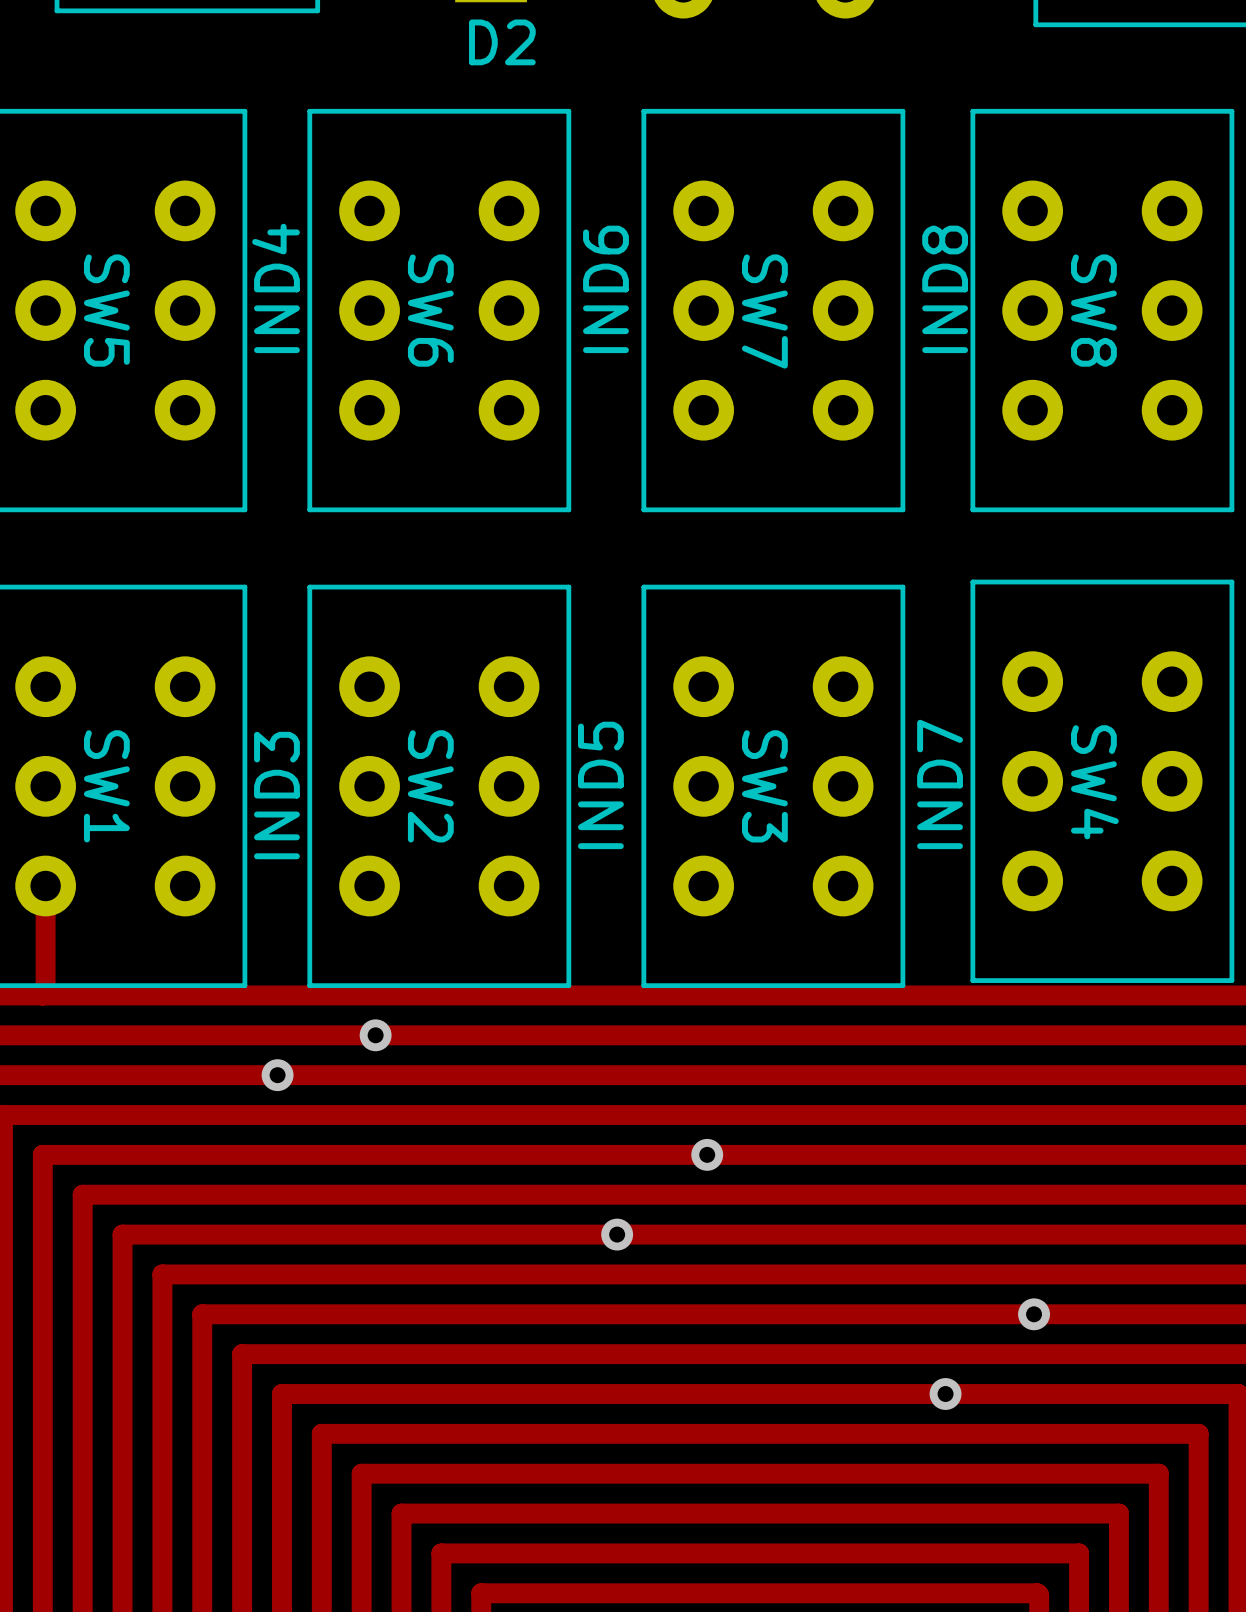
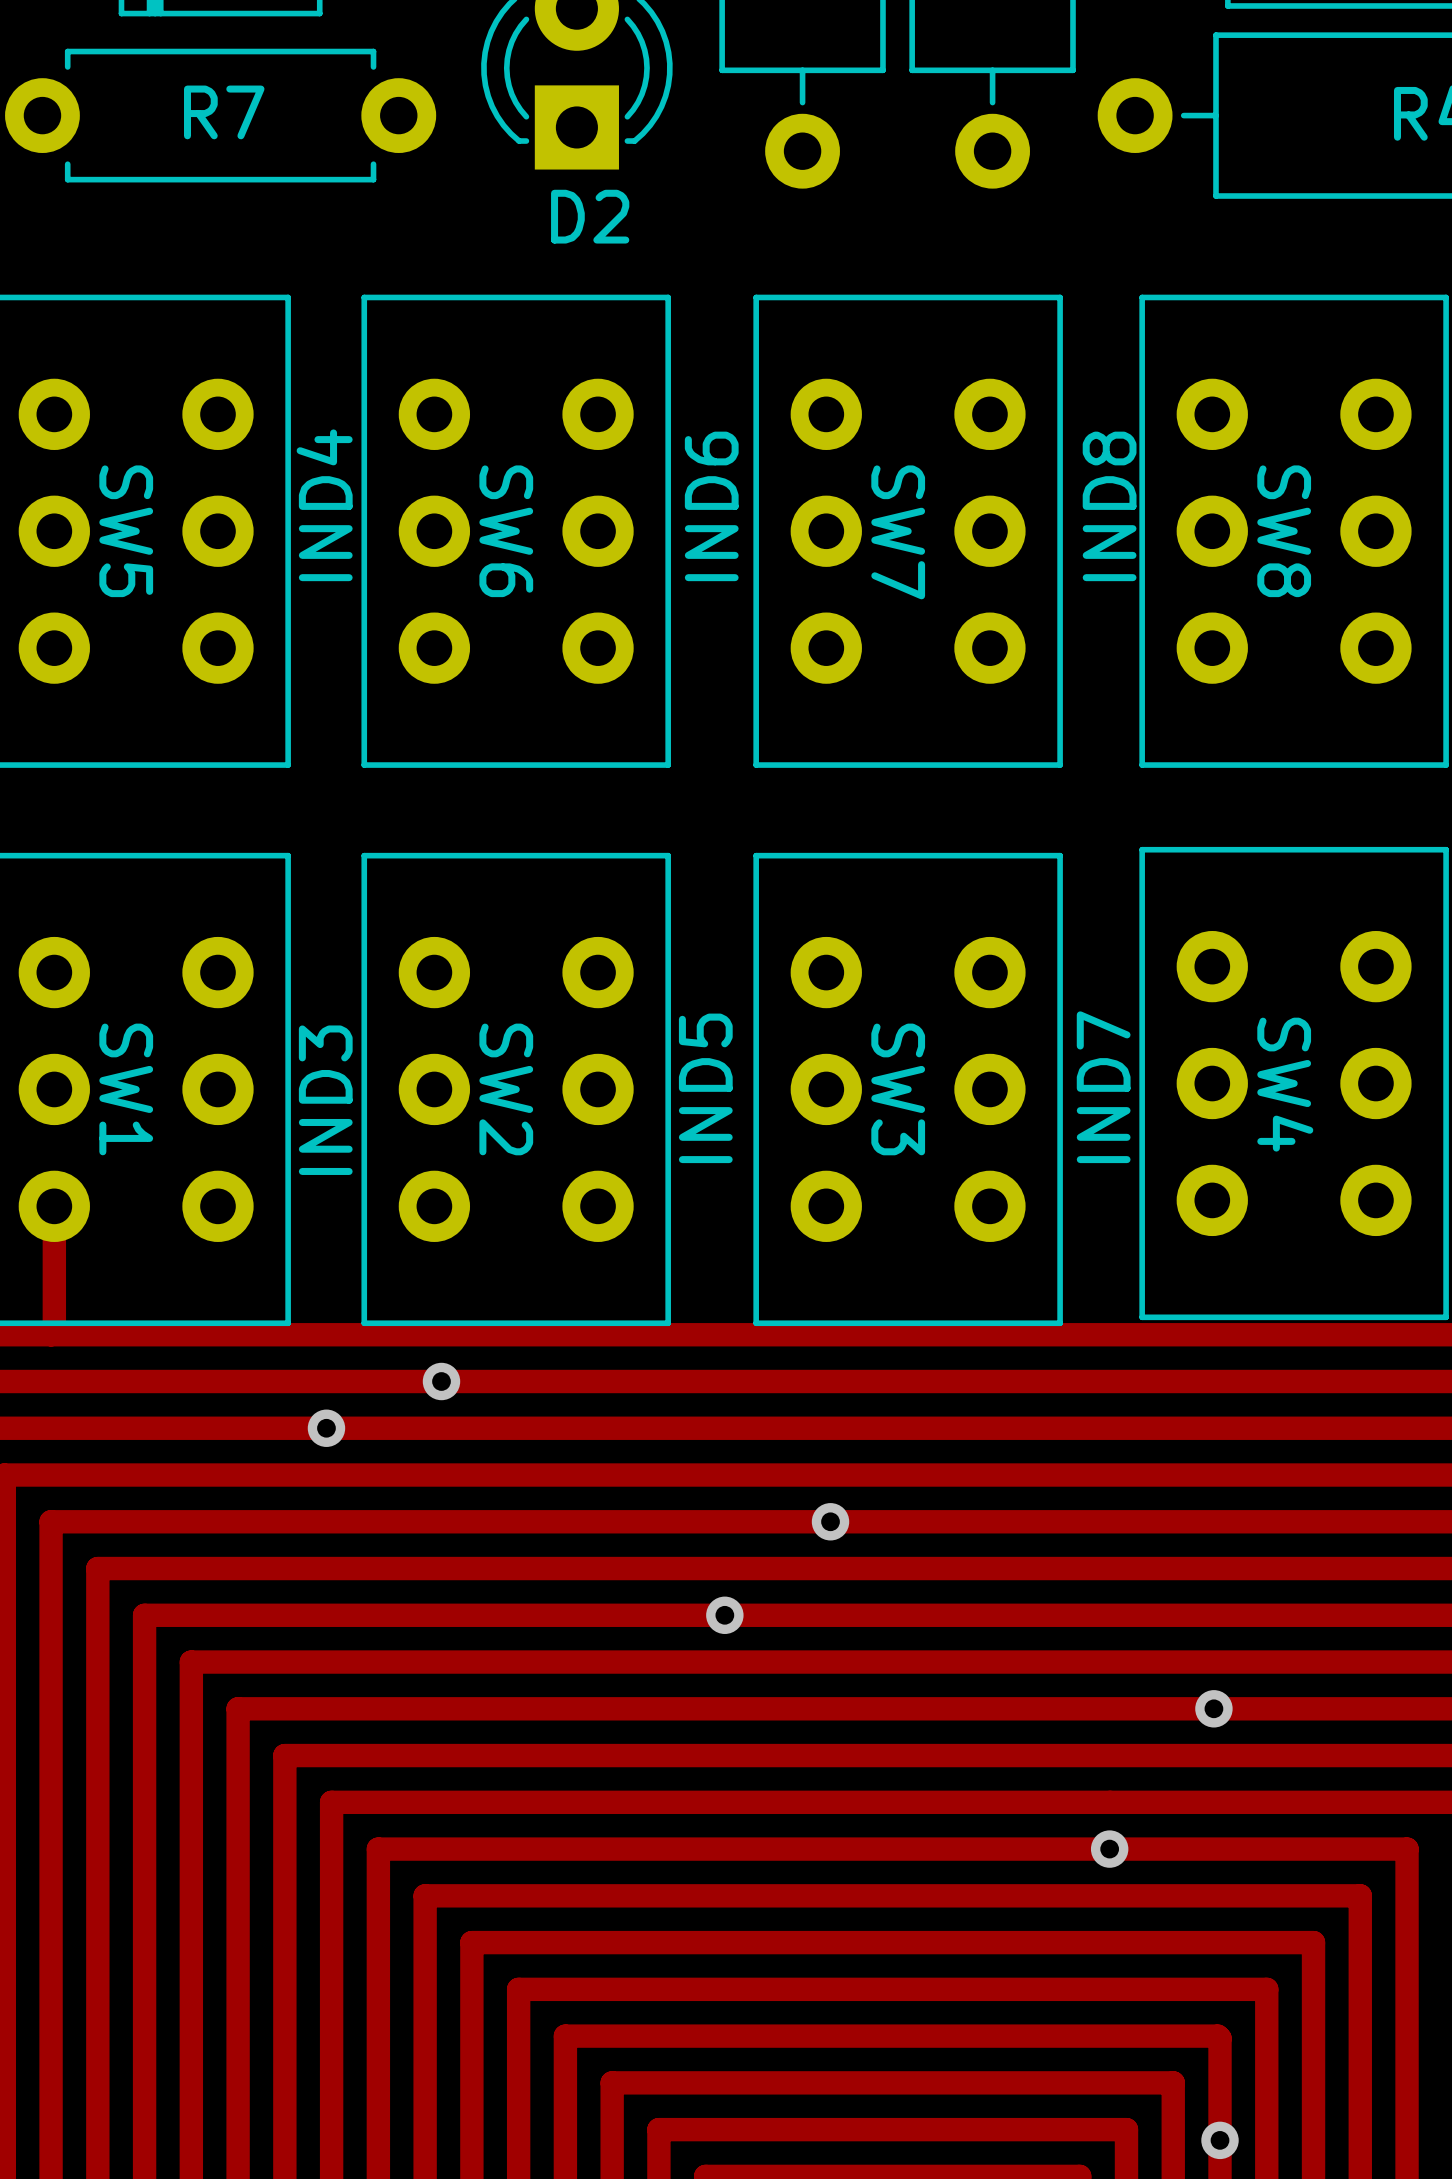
via position: (945, 1394) -> (1109, 1849)

